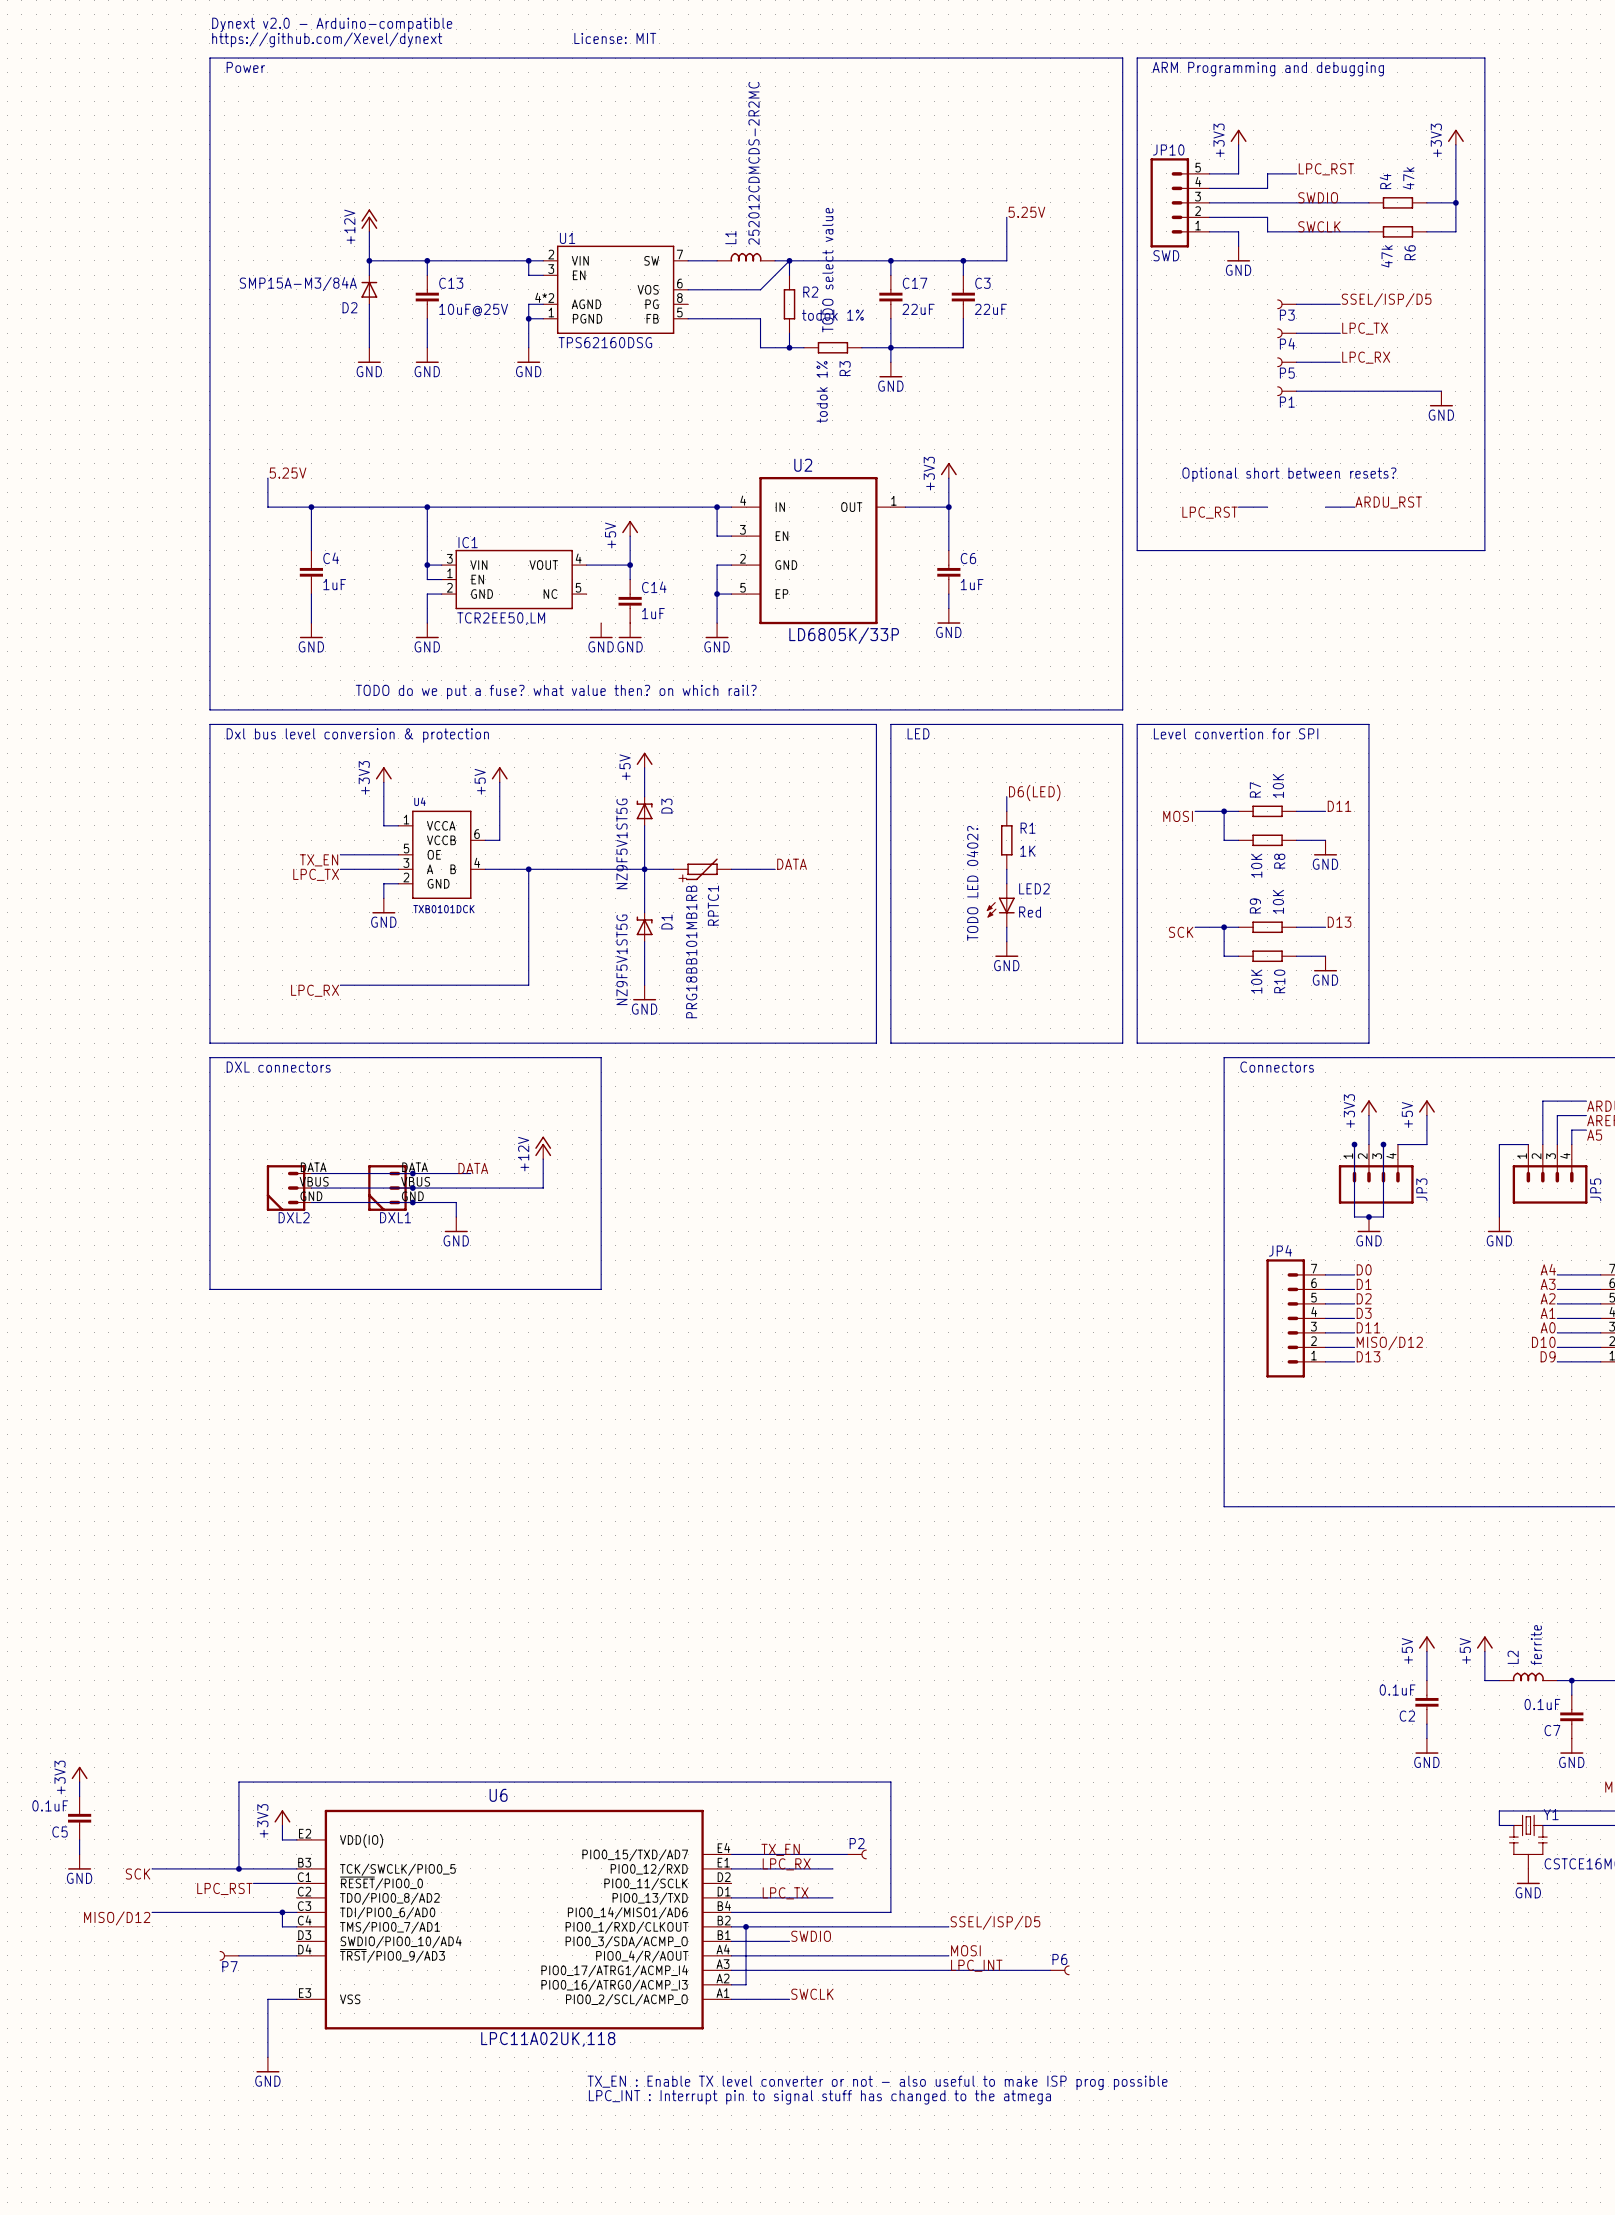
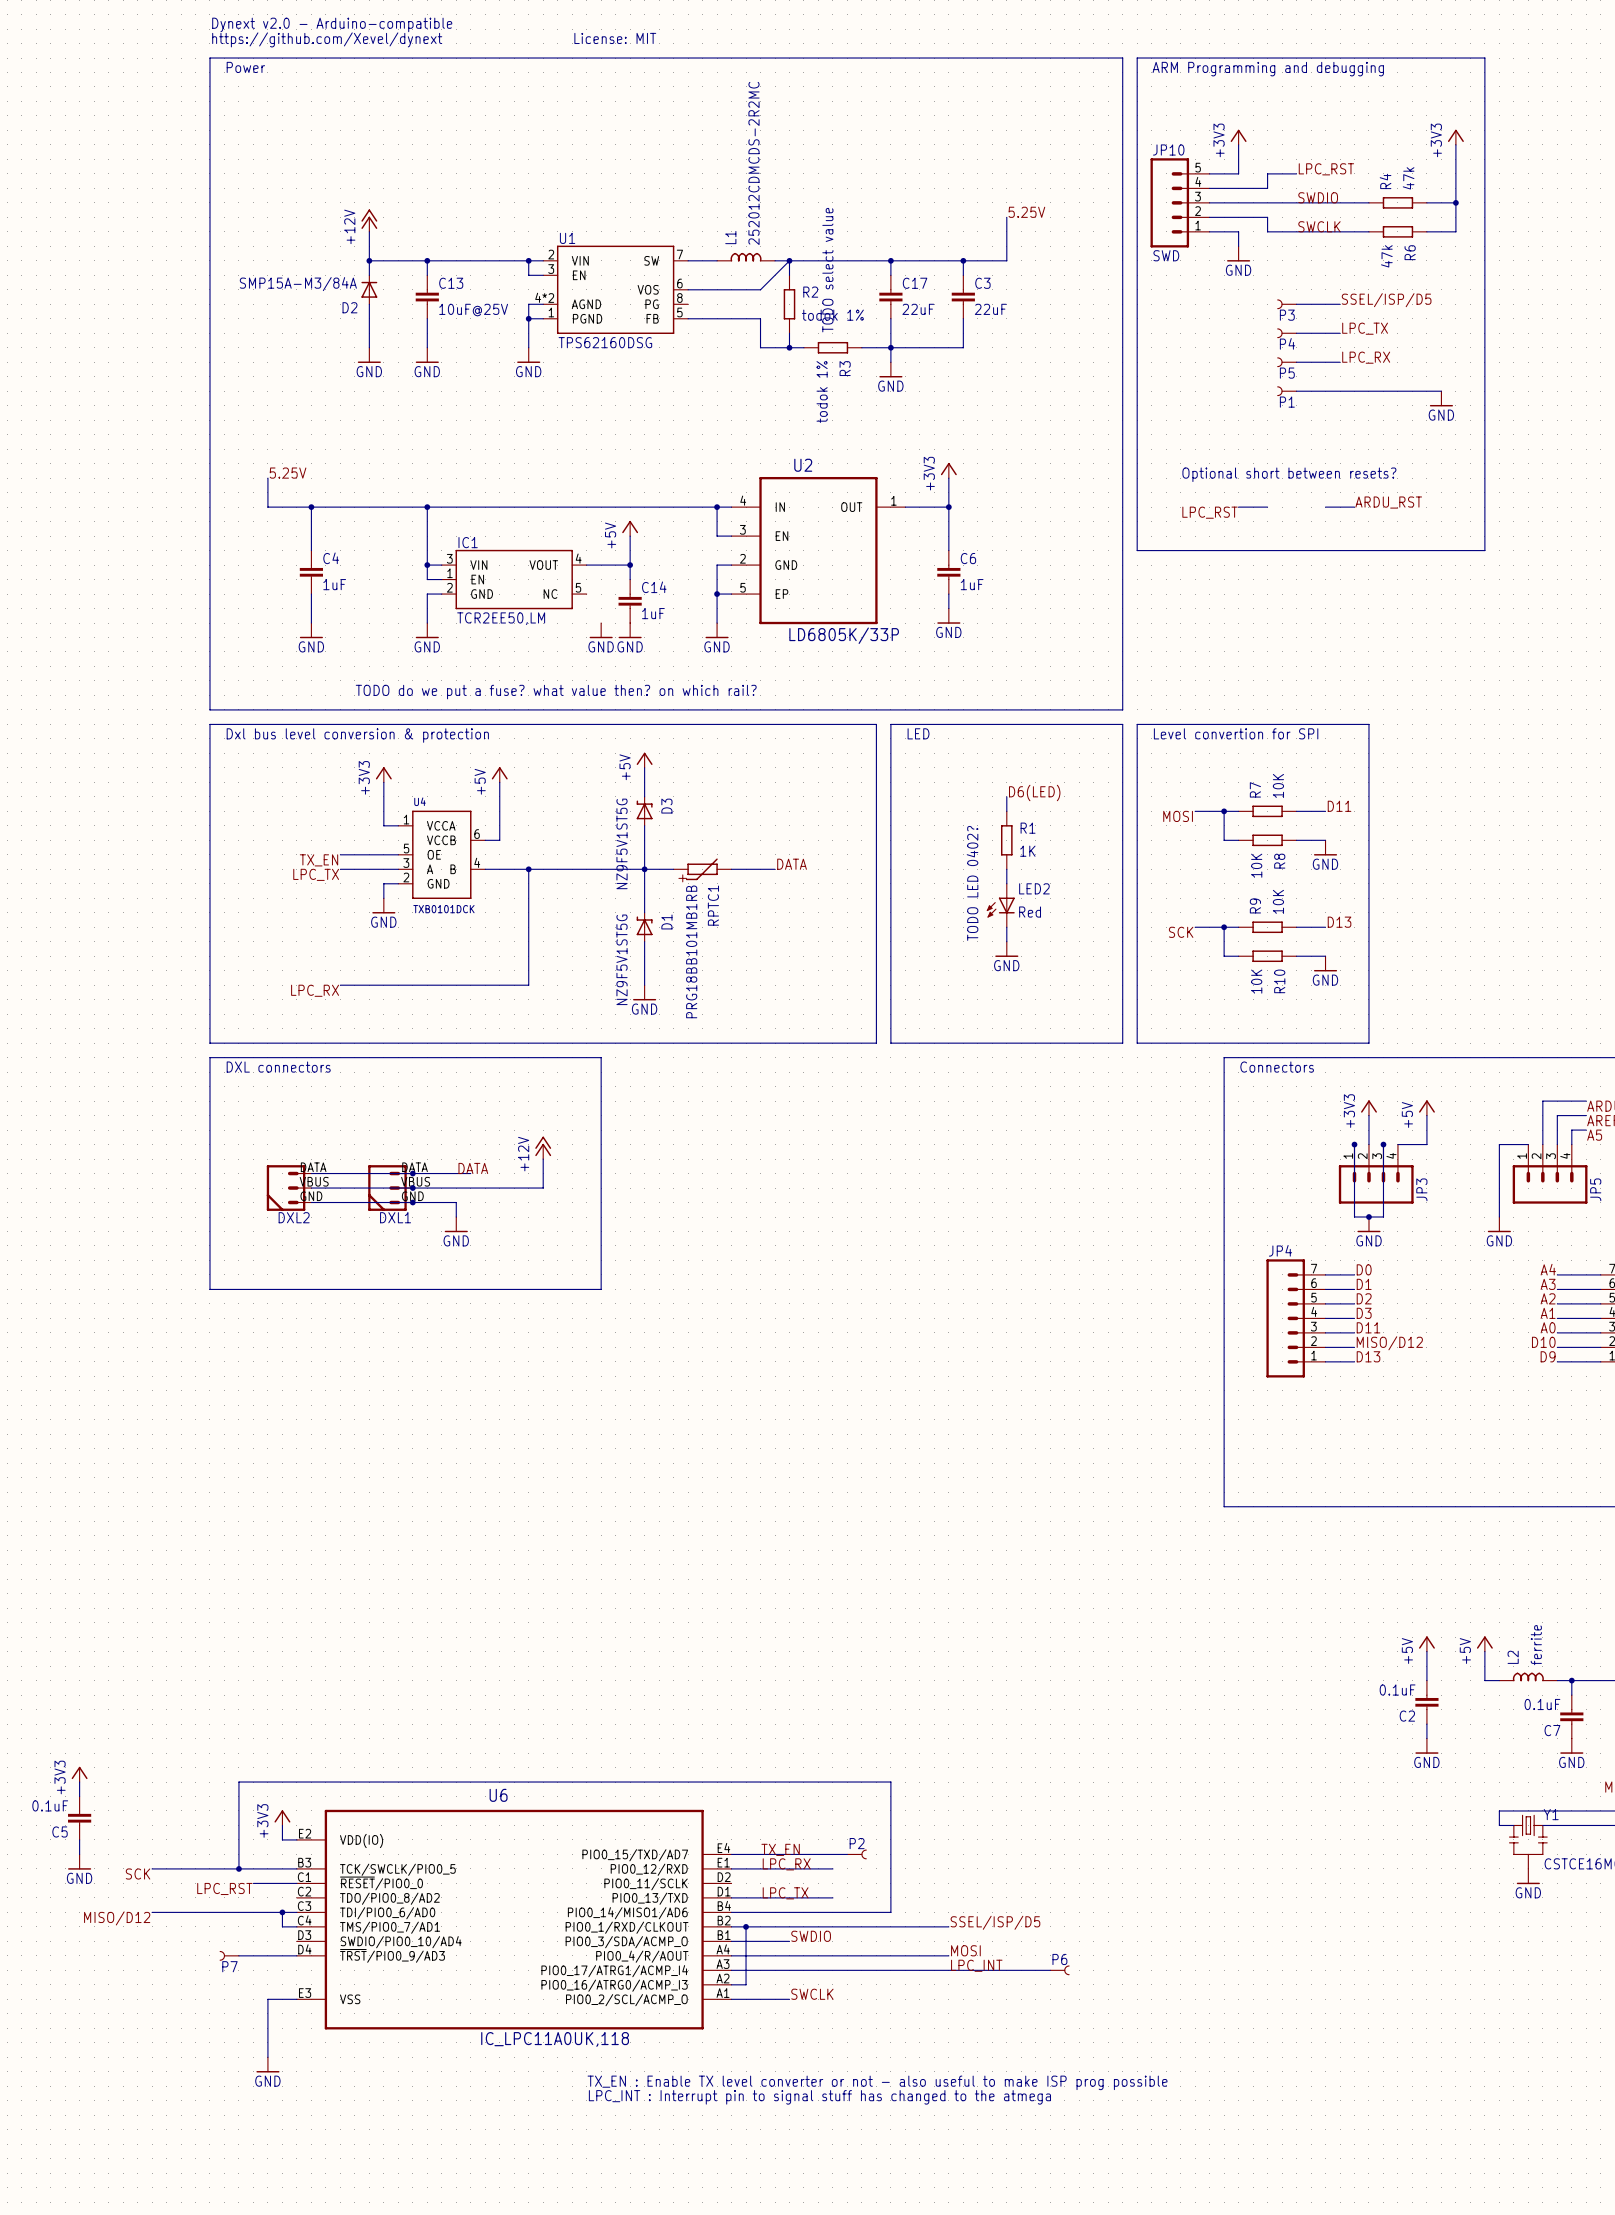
U6 value: LPC11A02UK,118 (548, 2039) -> IC_LPC11A0UK,118 (555, 2039)

